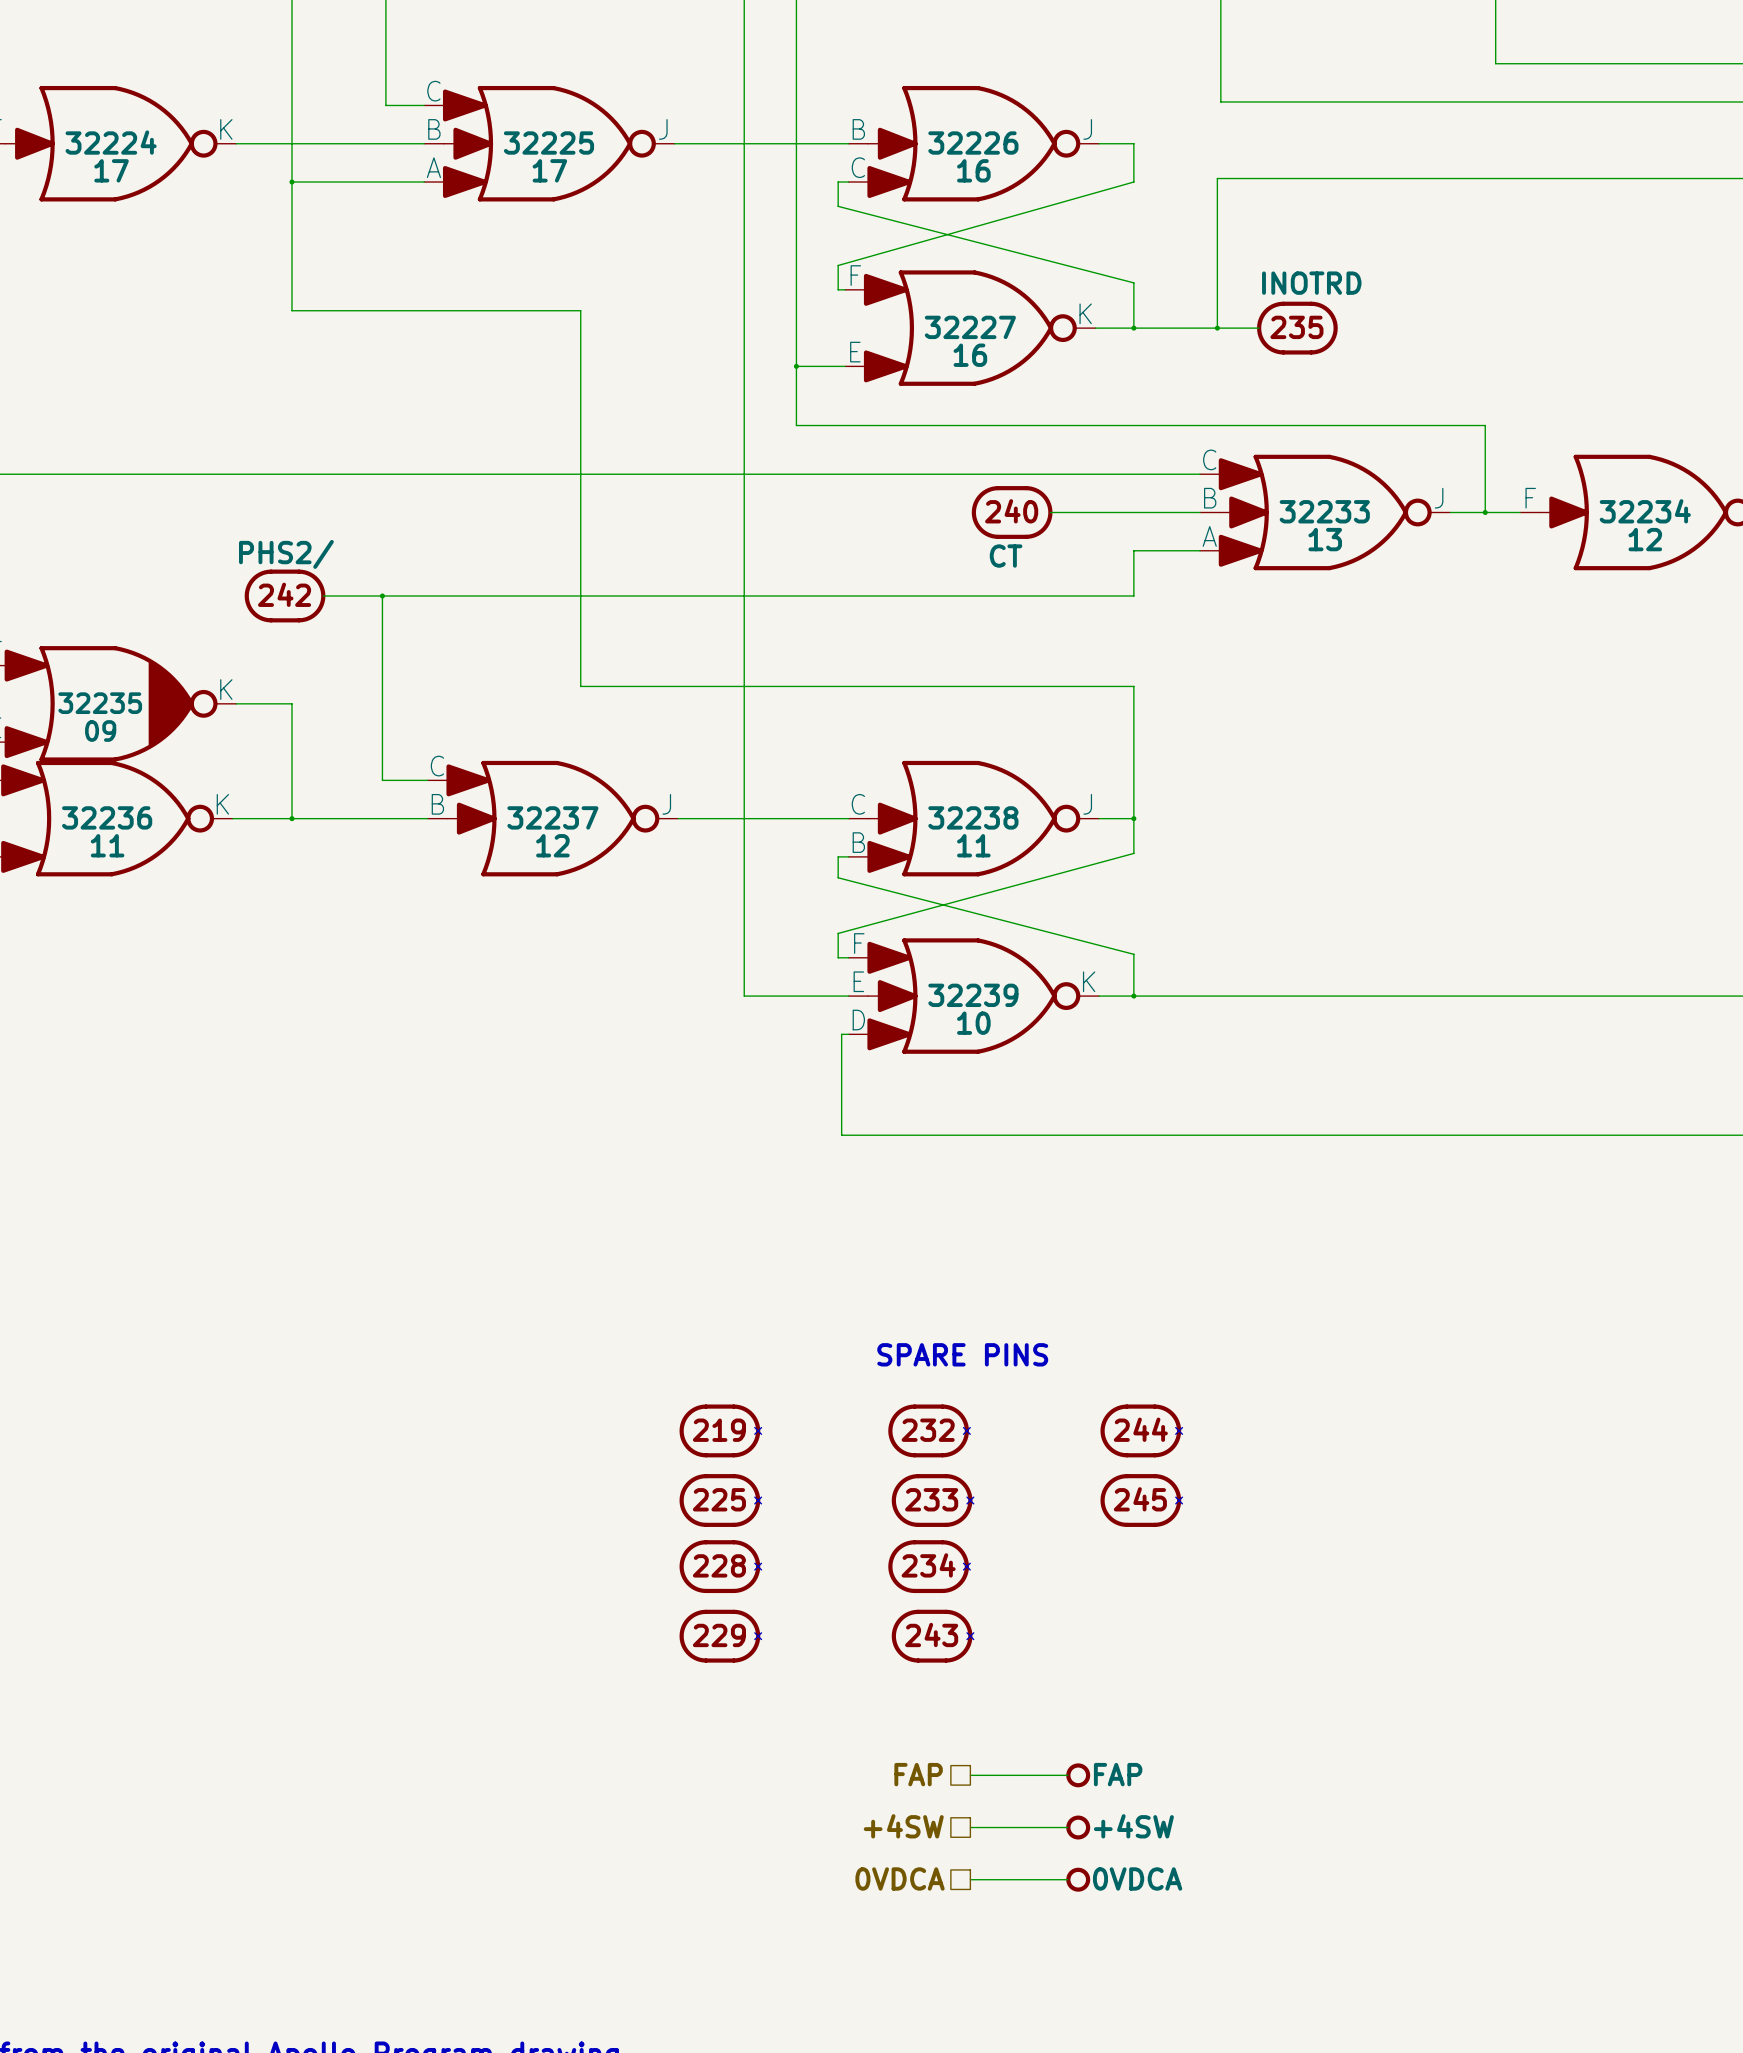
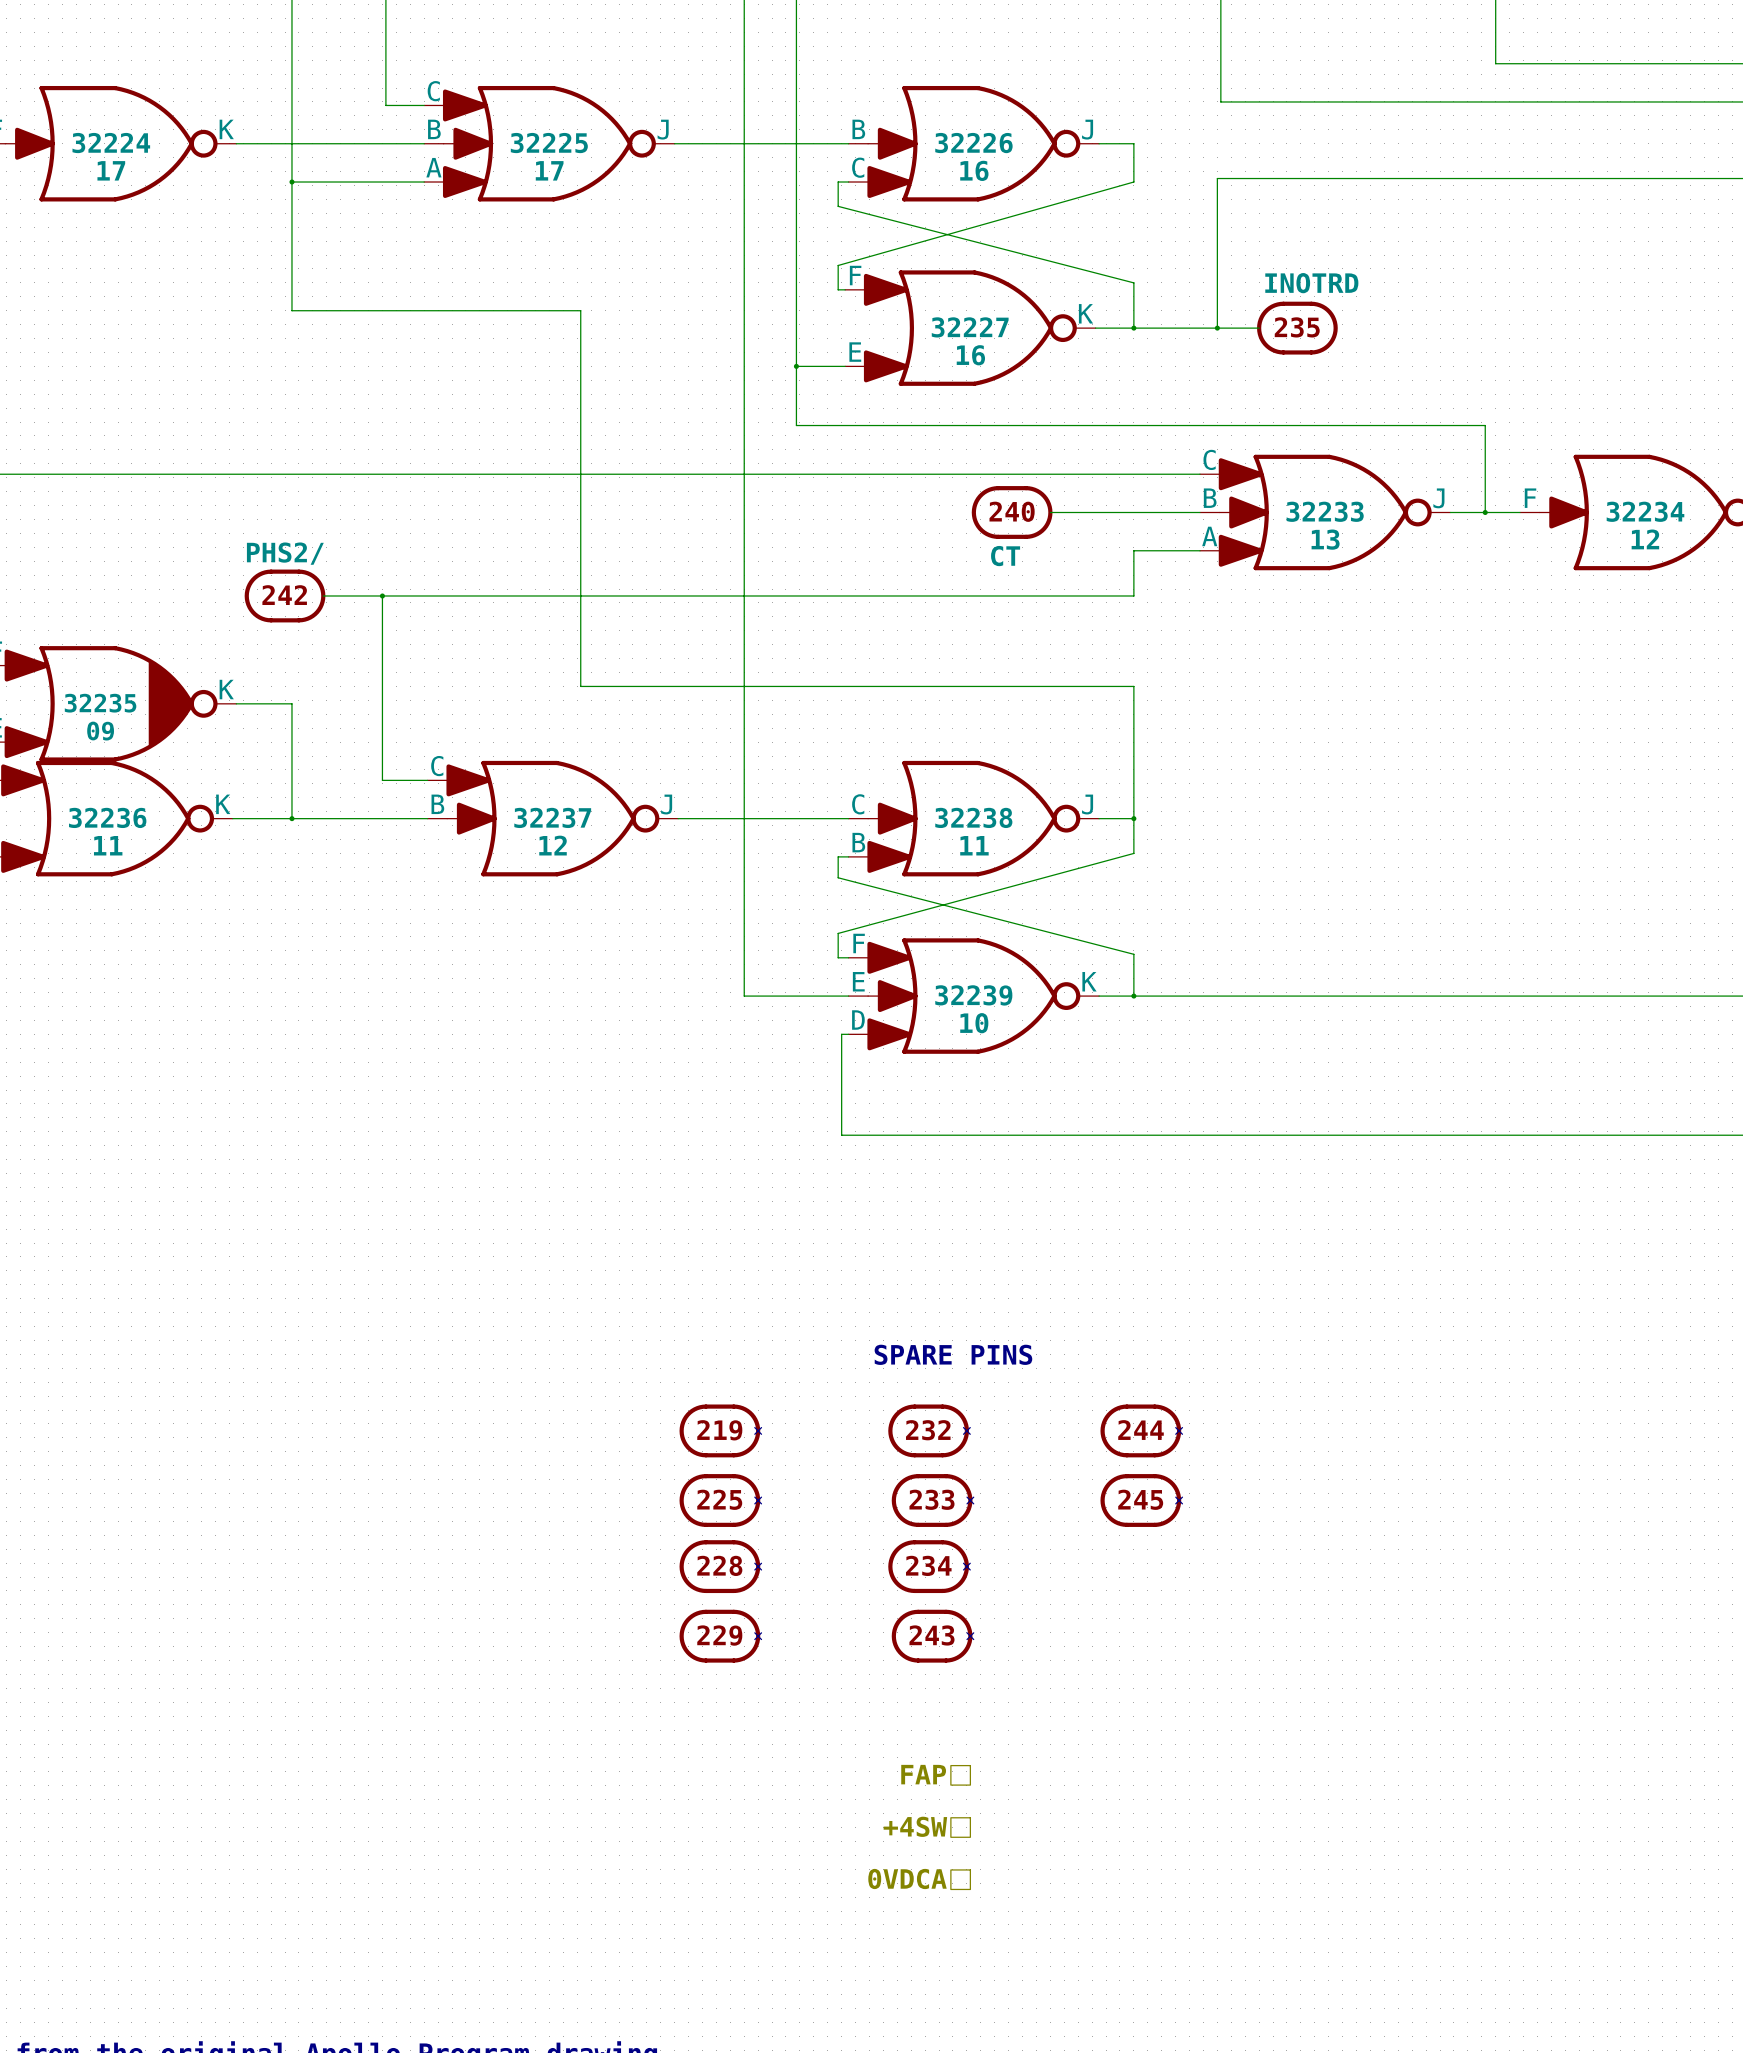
wire: (970, 1775) (1067, 1775) -> none
part: (1078, 1775) -> none
wire: (970, 1827) (1067, 1827) -> none
part: (1078, 1827) -> none
wire: (970, 1879) (1067, 1879) -> none
part: (1078, 1879) -> none

